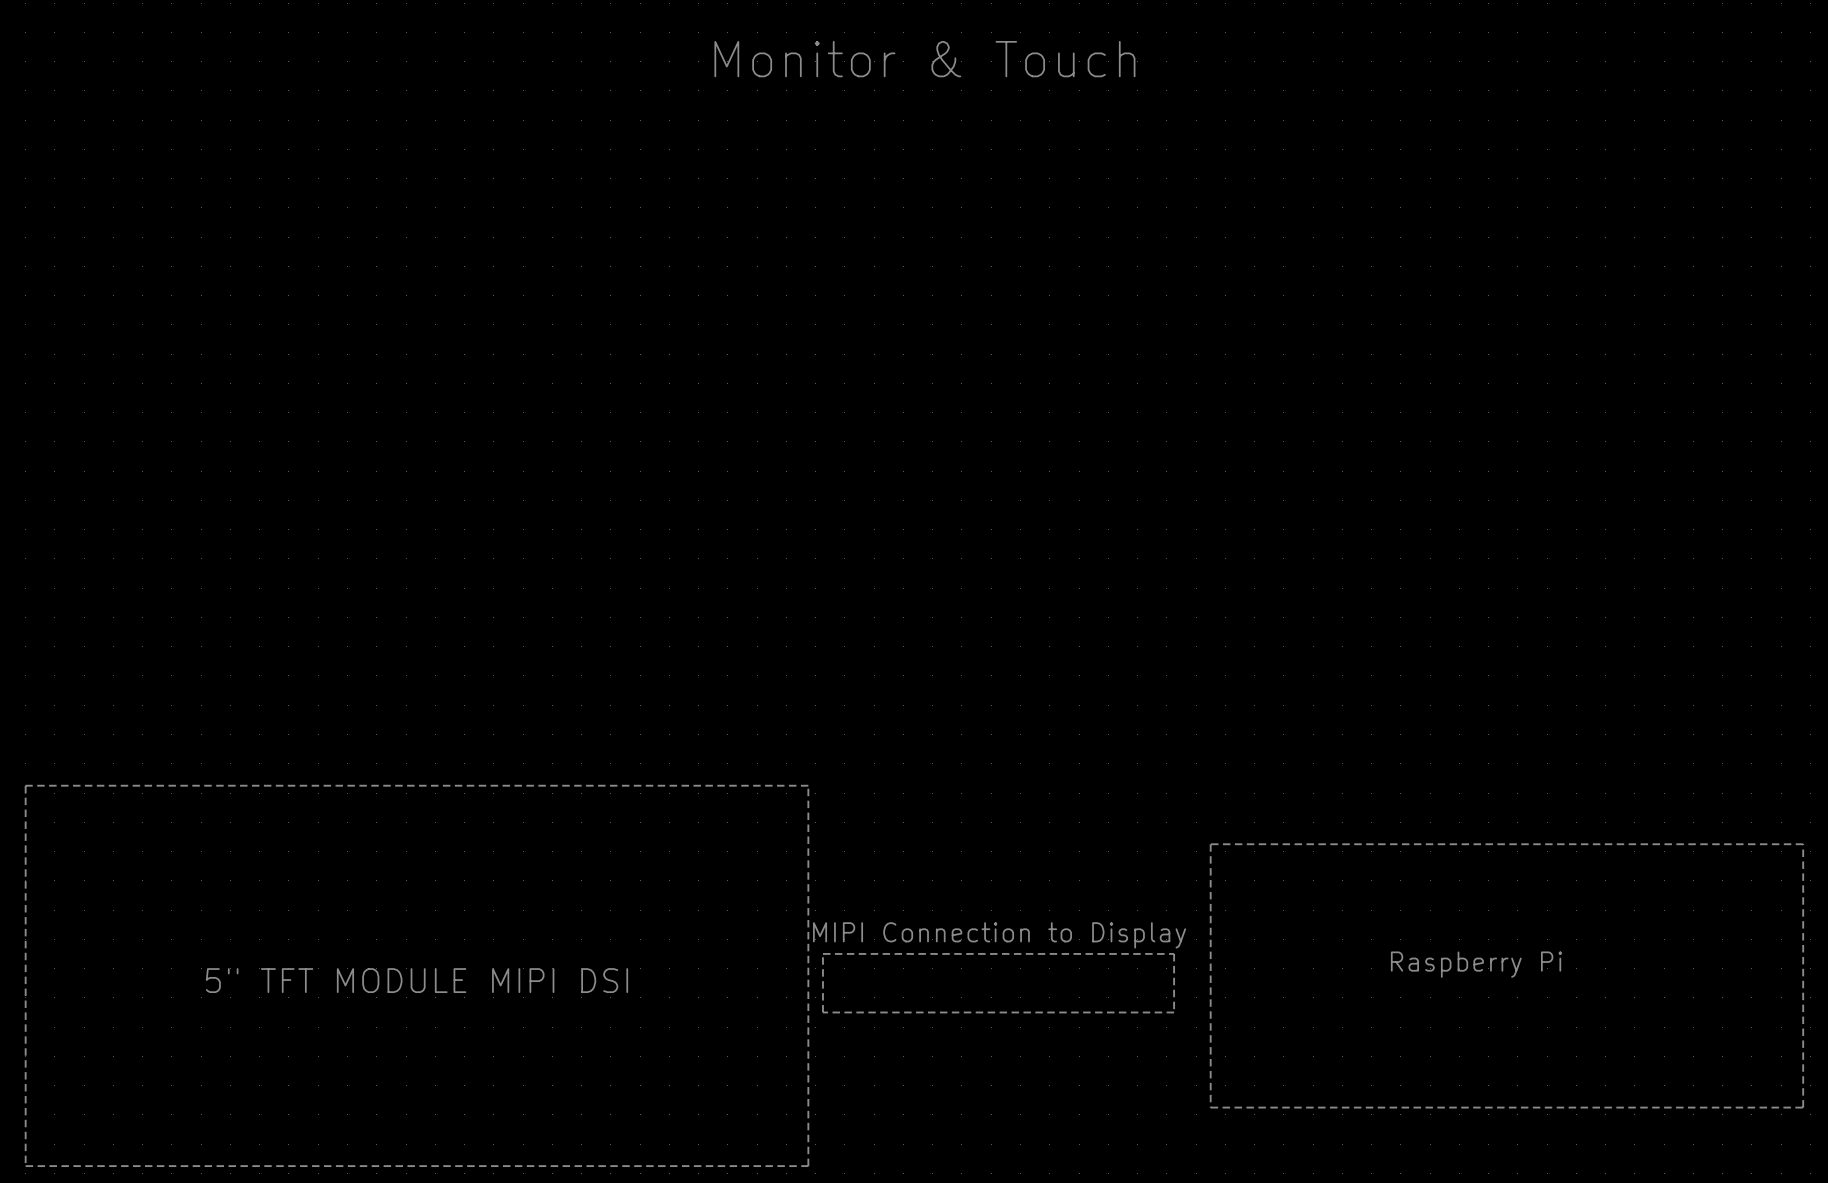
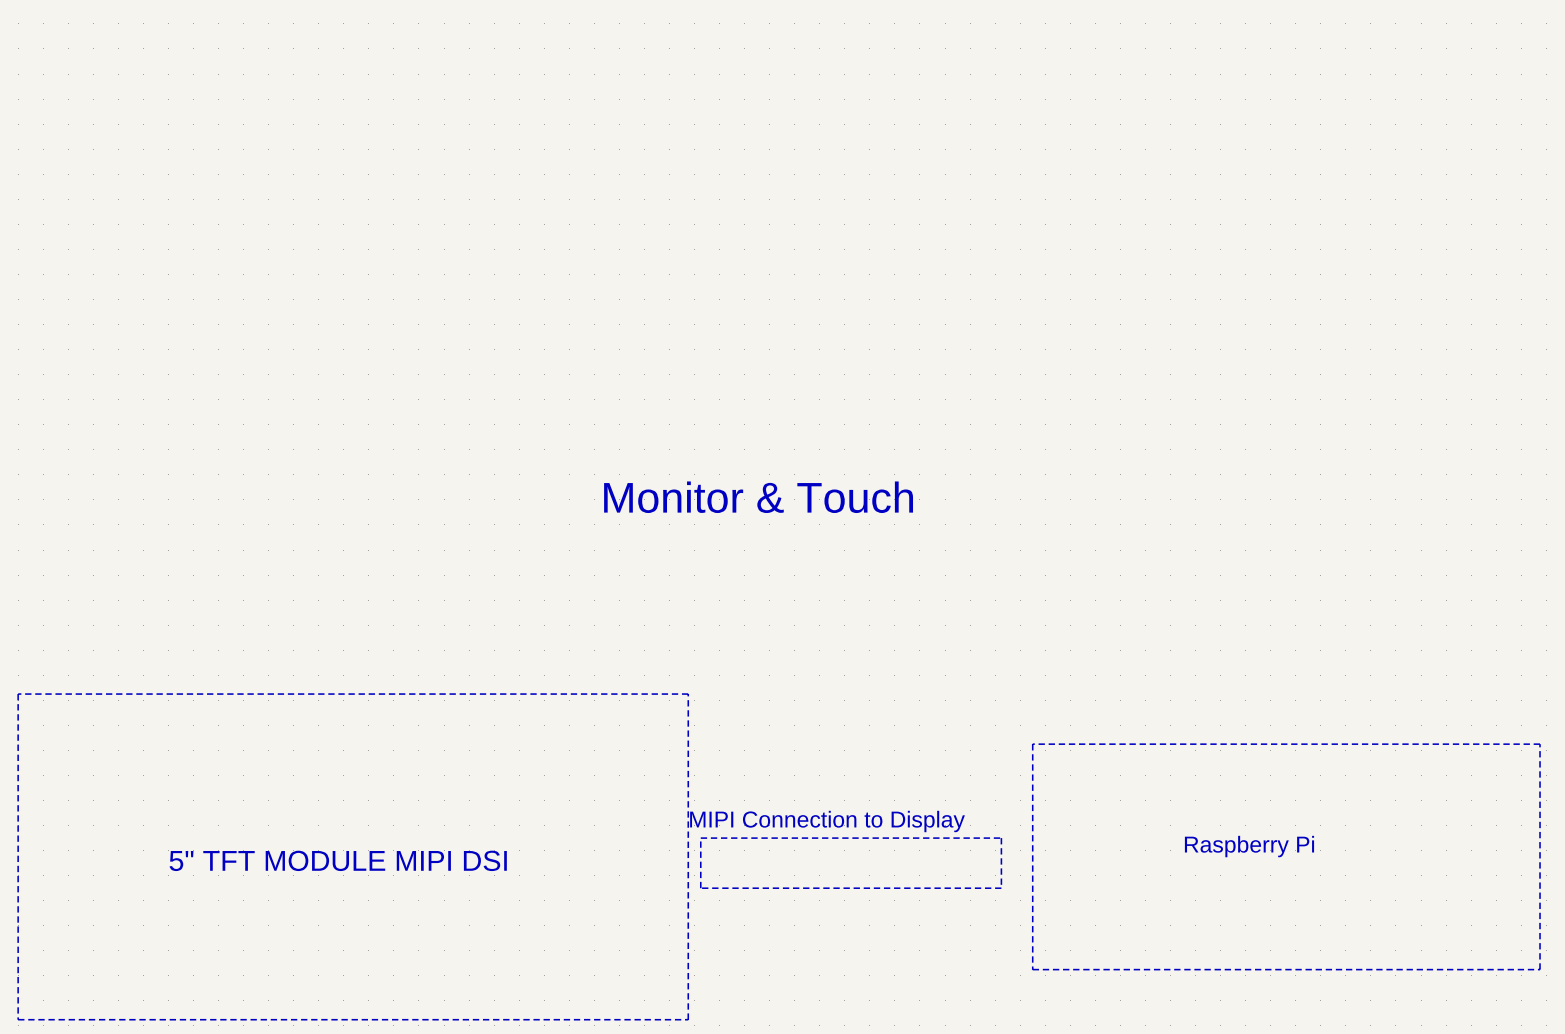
text: Monitor & Touch (924, 59) -> none
text: none -> Monitor & Touch (758, 497)

